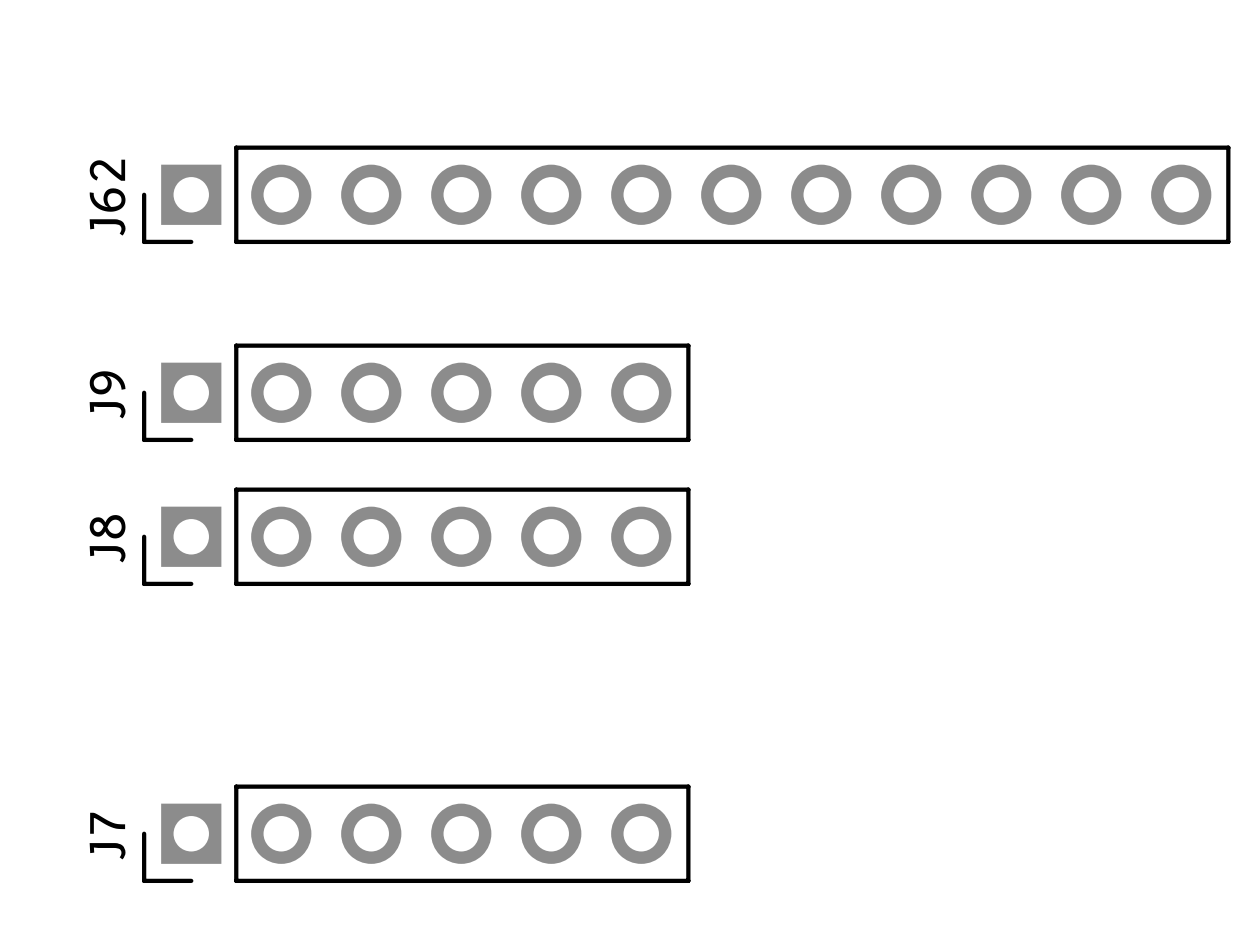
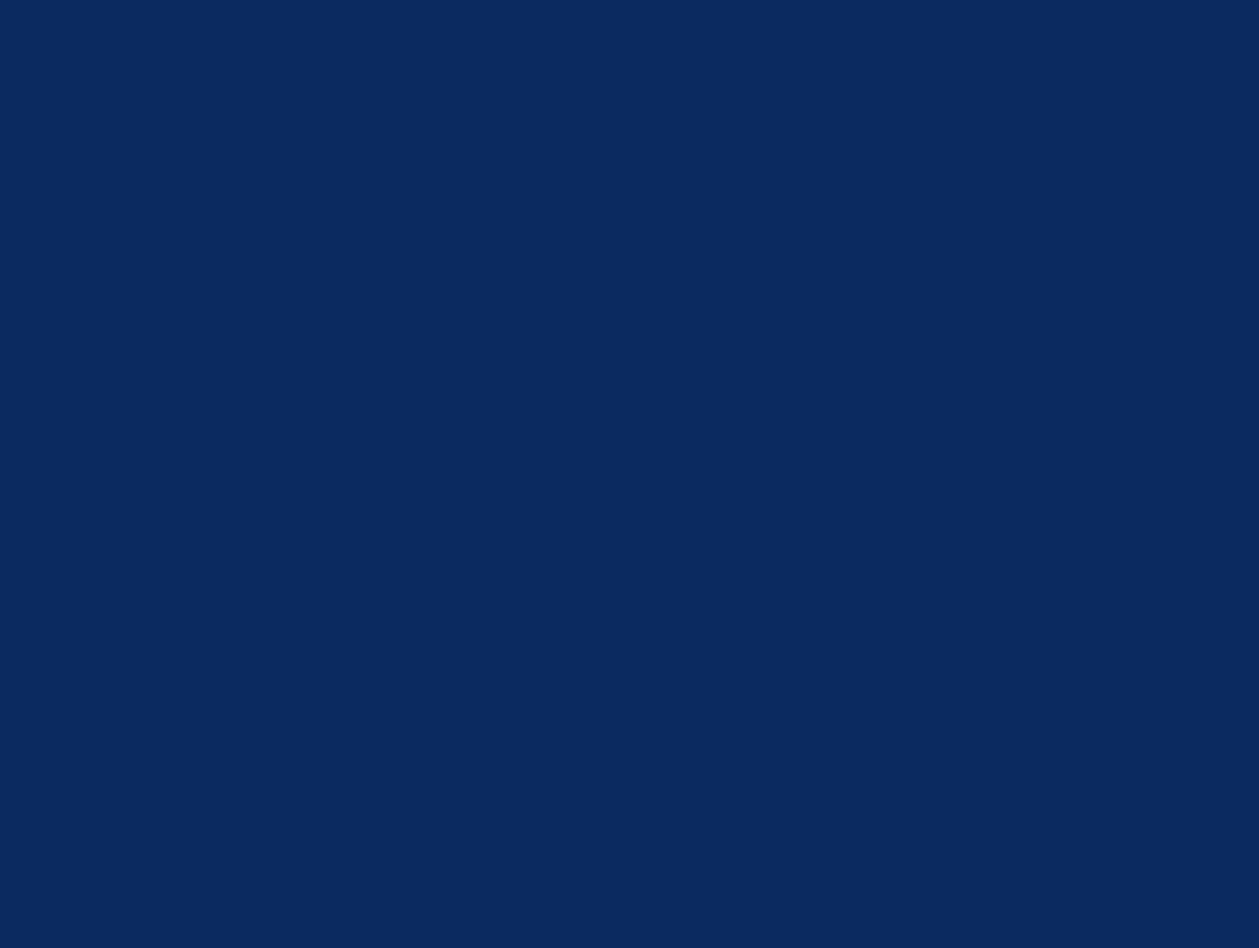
J62: (686, 194) -> none
J9: (416, 392) -> none
J8: (416, 536) -> none
J7: (416, 833) -> none

